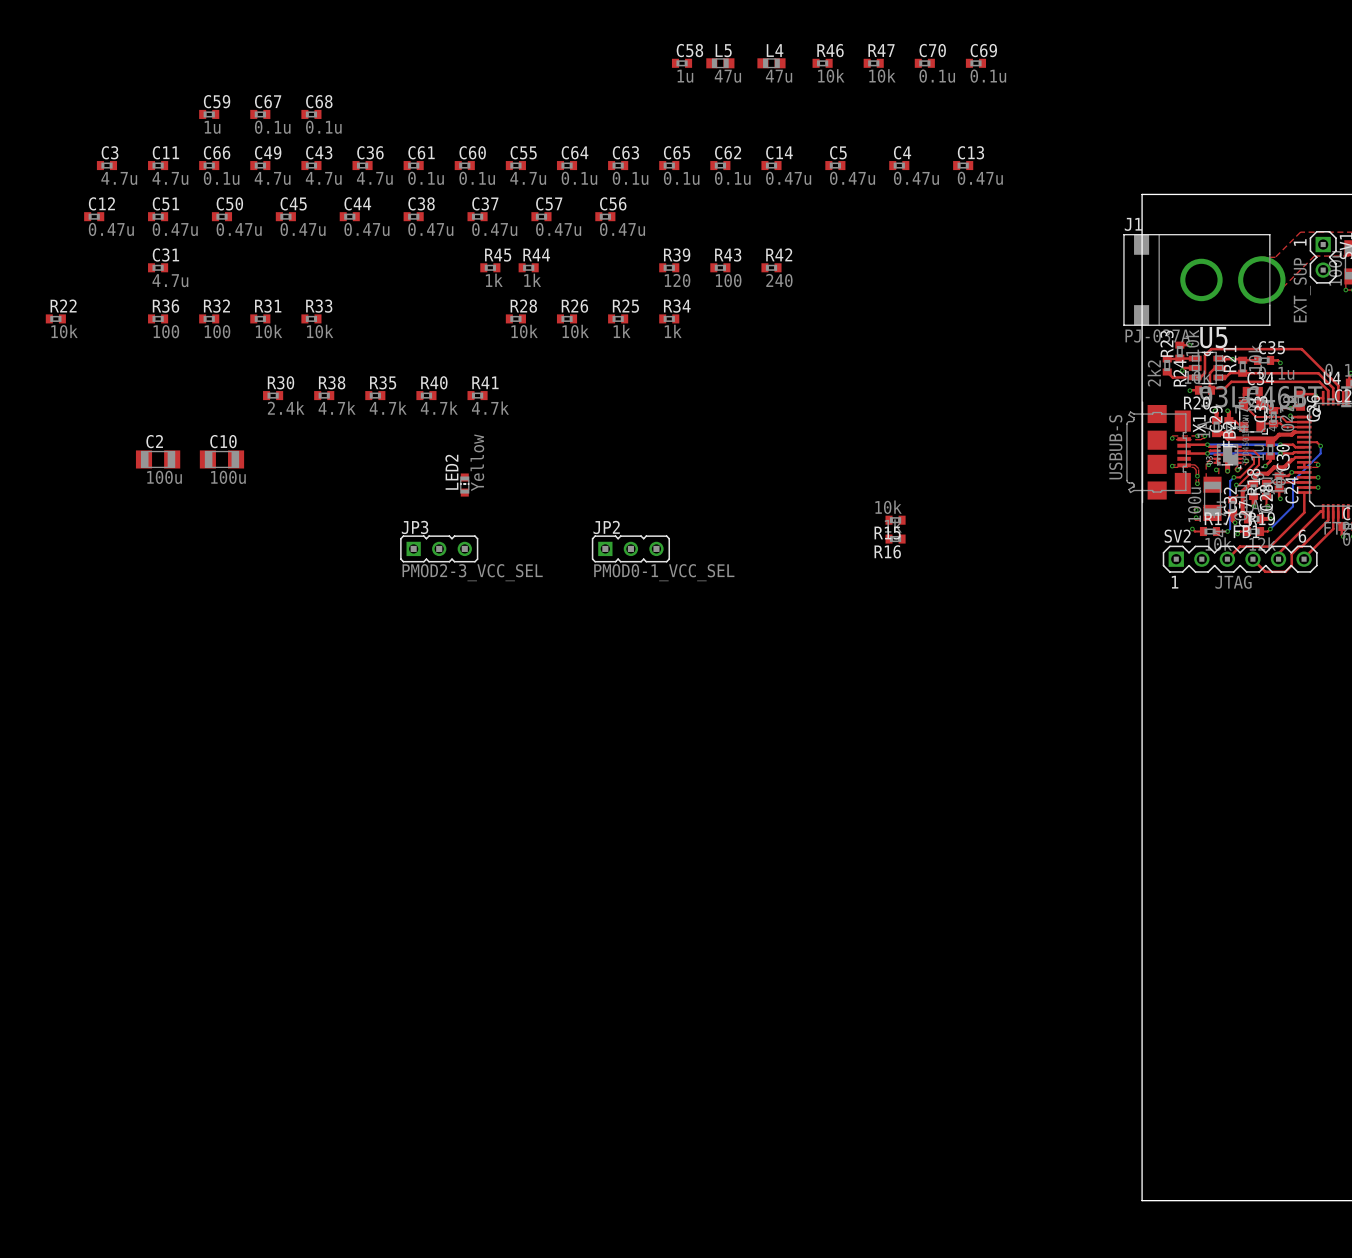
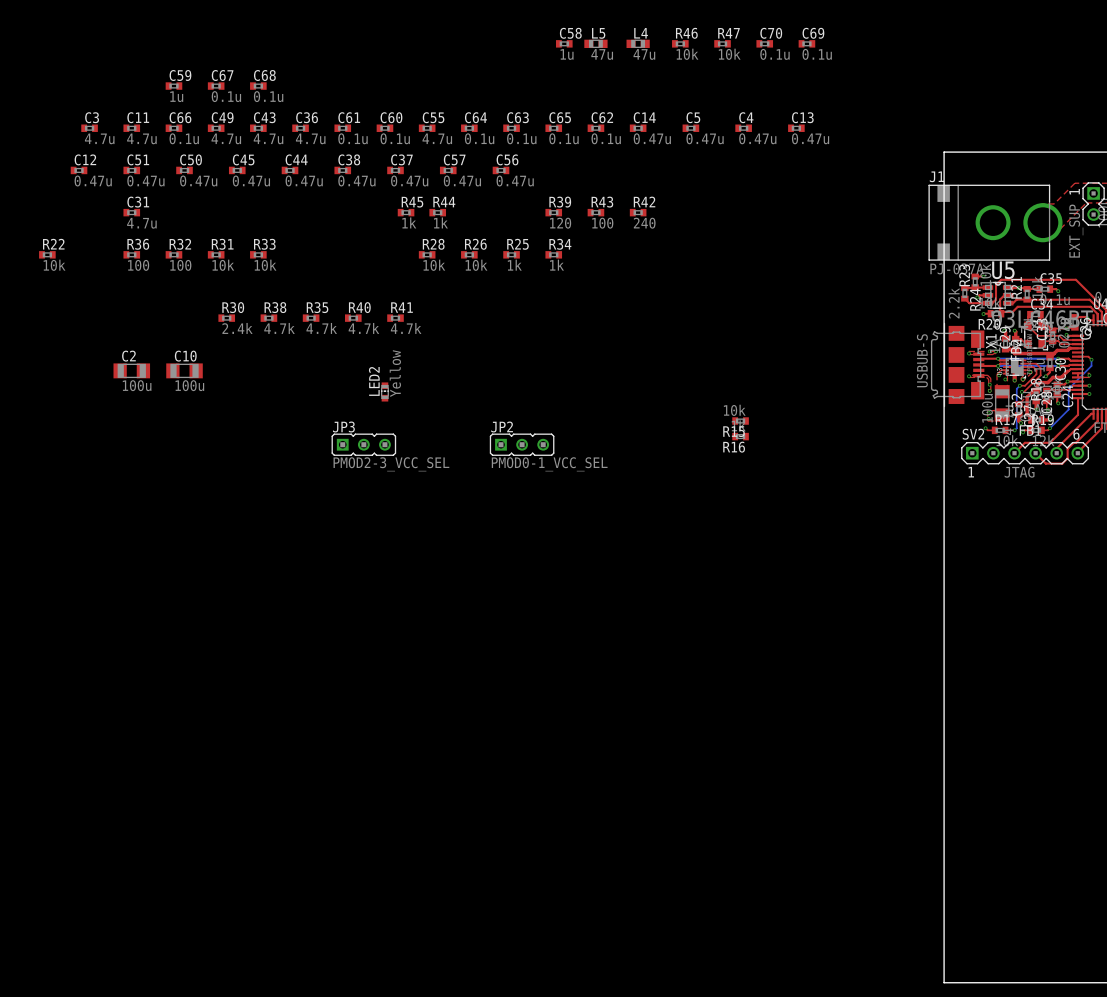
R24 value: 2k2 (1154, 373) -> 2.2k (954, 303)

